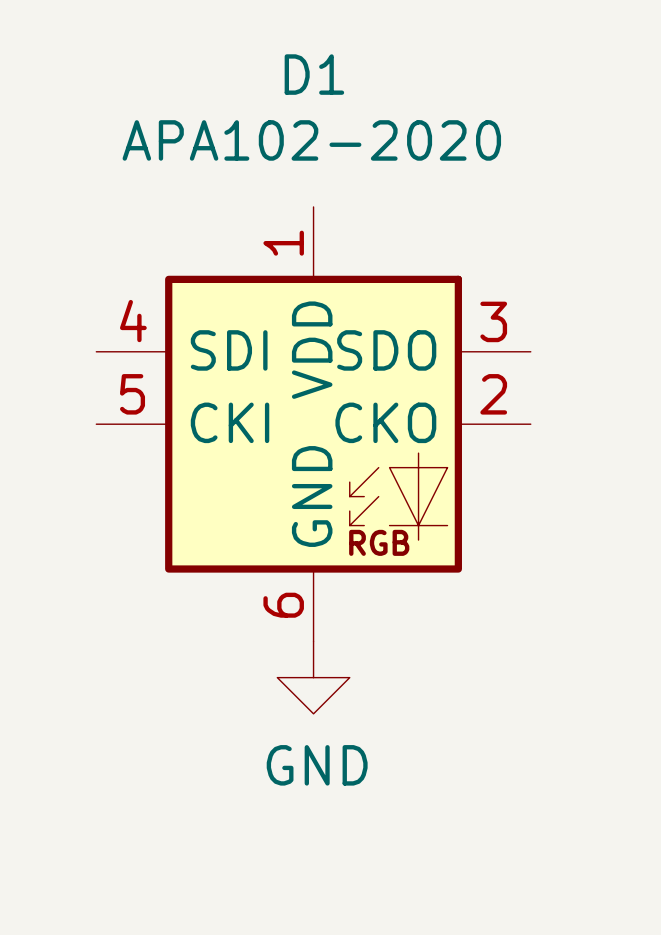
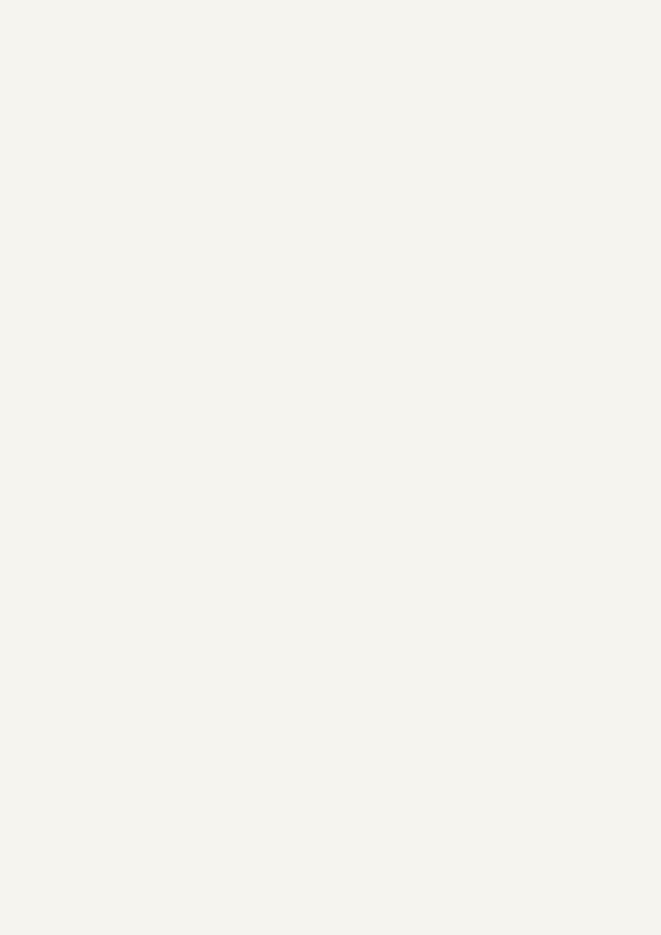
D1: APA102-2020 (313, 424) -> none
power symbol: GND (313, 677) -> none

